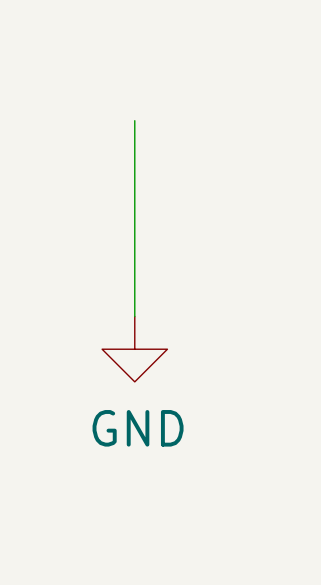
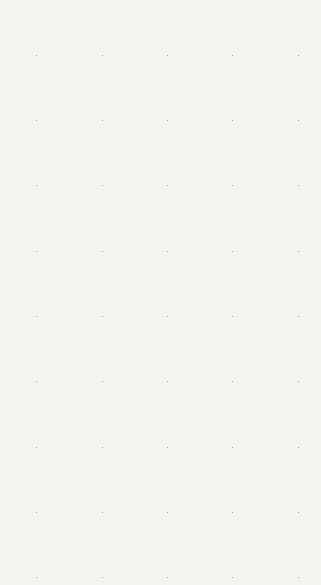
wire: (134, 120) (134, 316) -> none
power symbol: GND (134, 349) -> none

